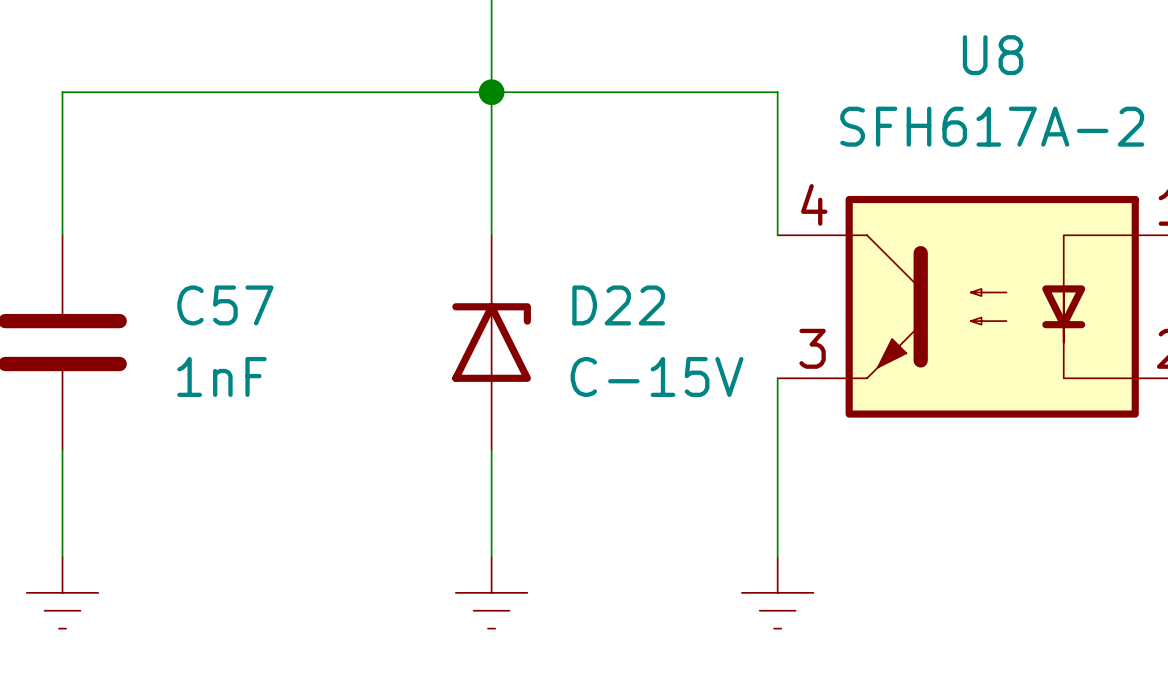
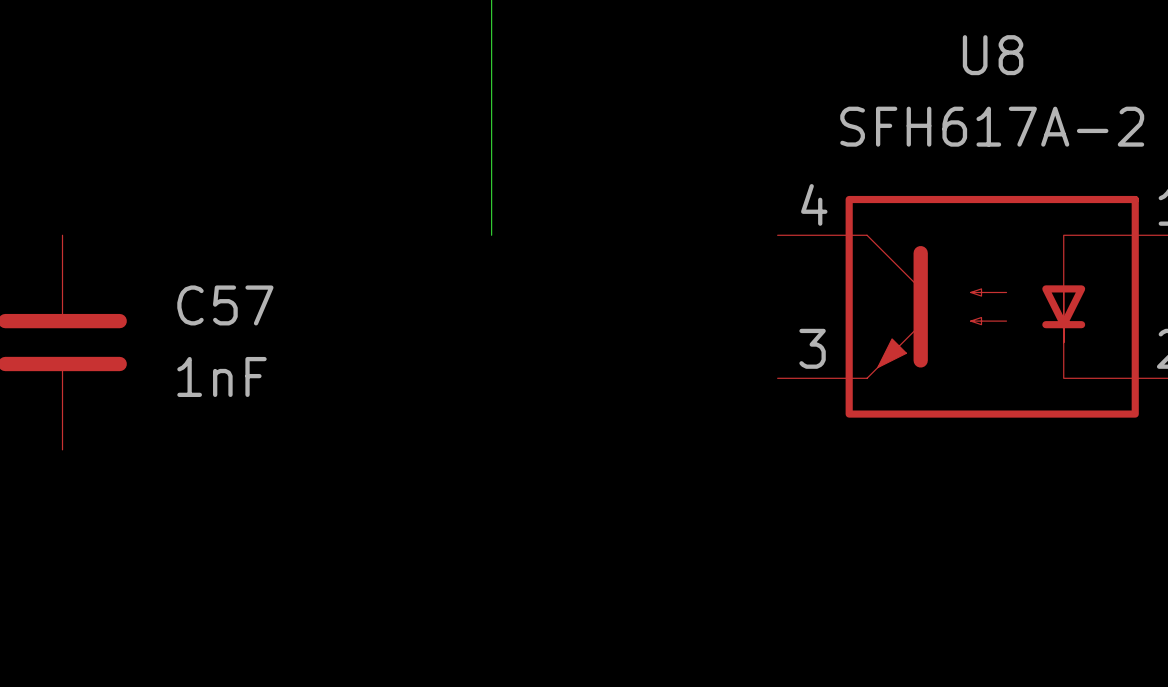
junction: (491, 92) -> none
wire: (62, 235) (62, 92) (777, 92) (777, 235) -> none
D22: C-15V (491, 342) -> none
wire: (777, 378) (777, 557) -> none
wire: (62, 449) (62, 557) -> none
wire: (491, 449) (491, 557) -> none
power symbol: (62, 592) -> none
power symbol: (491, 592) -> none
power symbol: (777, 592) -> none

